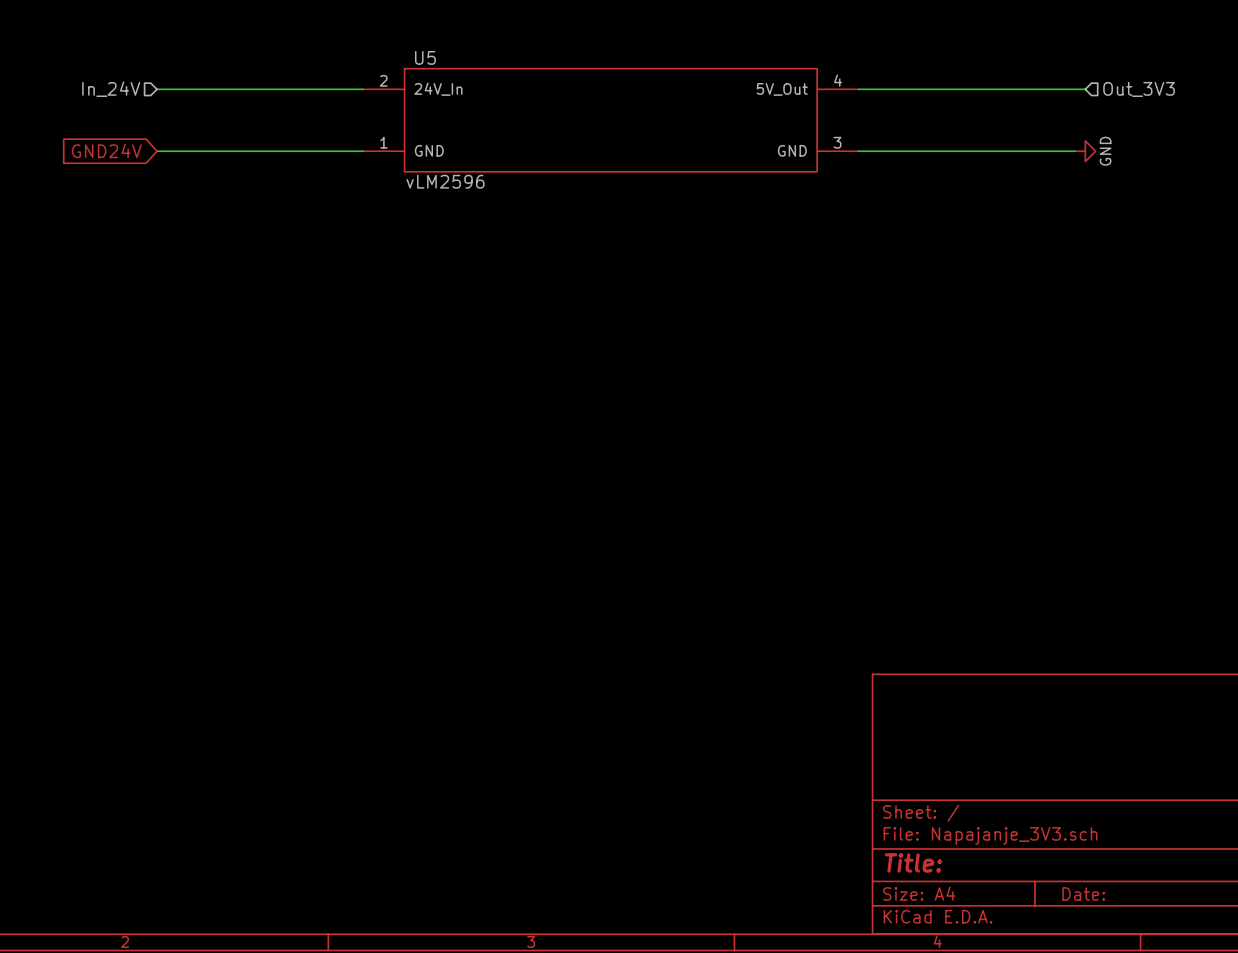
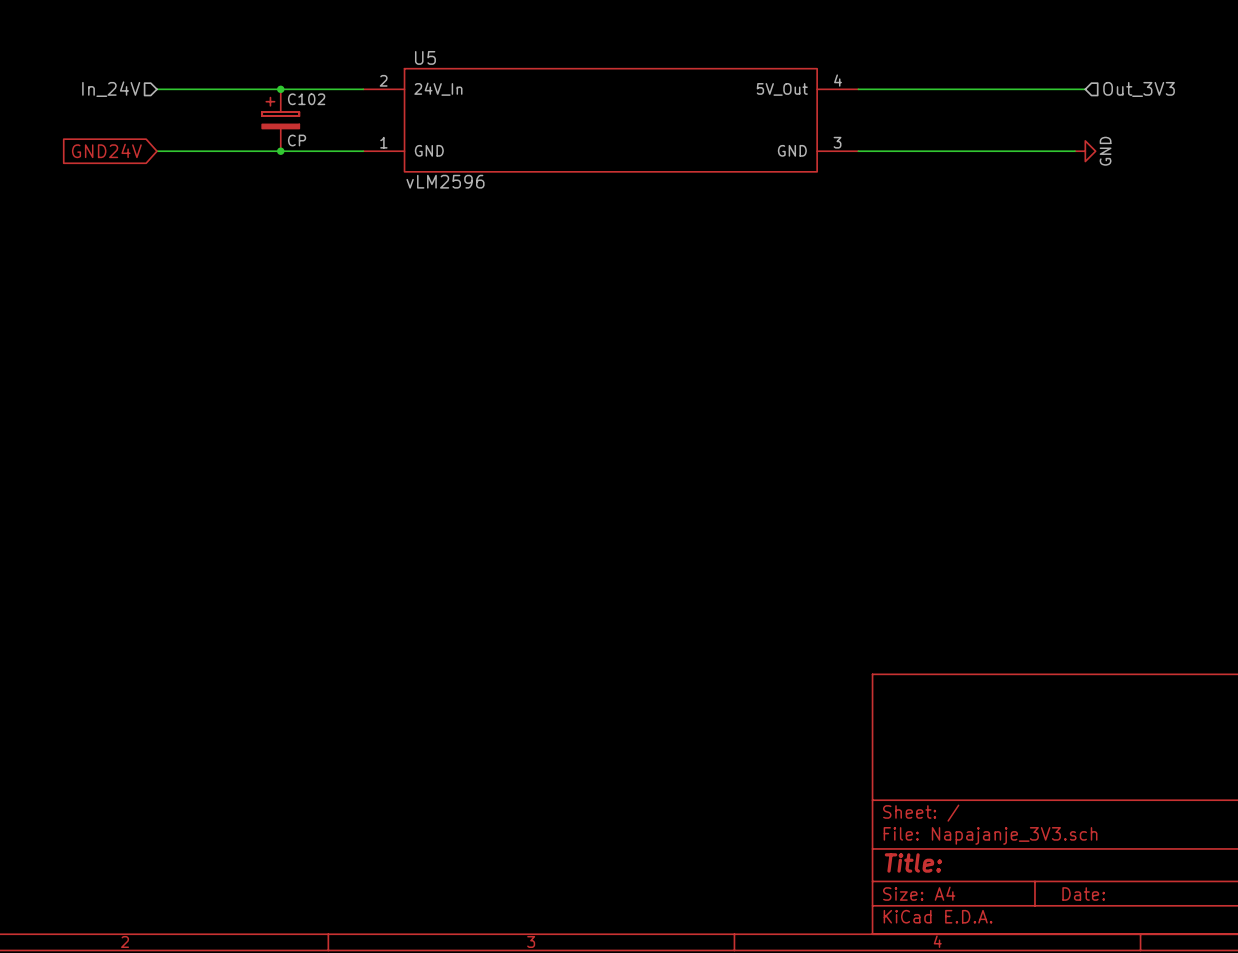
junction: none -> (280, 89)
C102: none -> CP (280, 120)
junction: none -> (280, 151)

